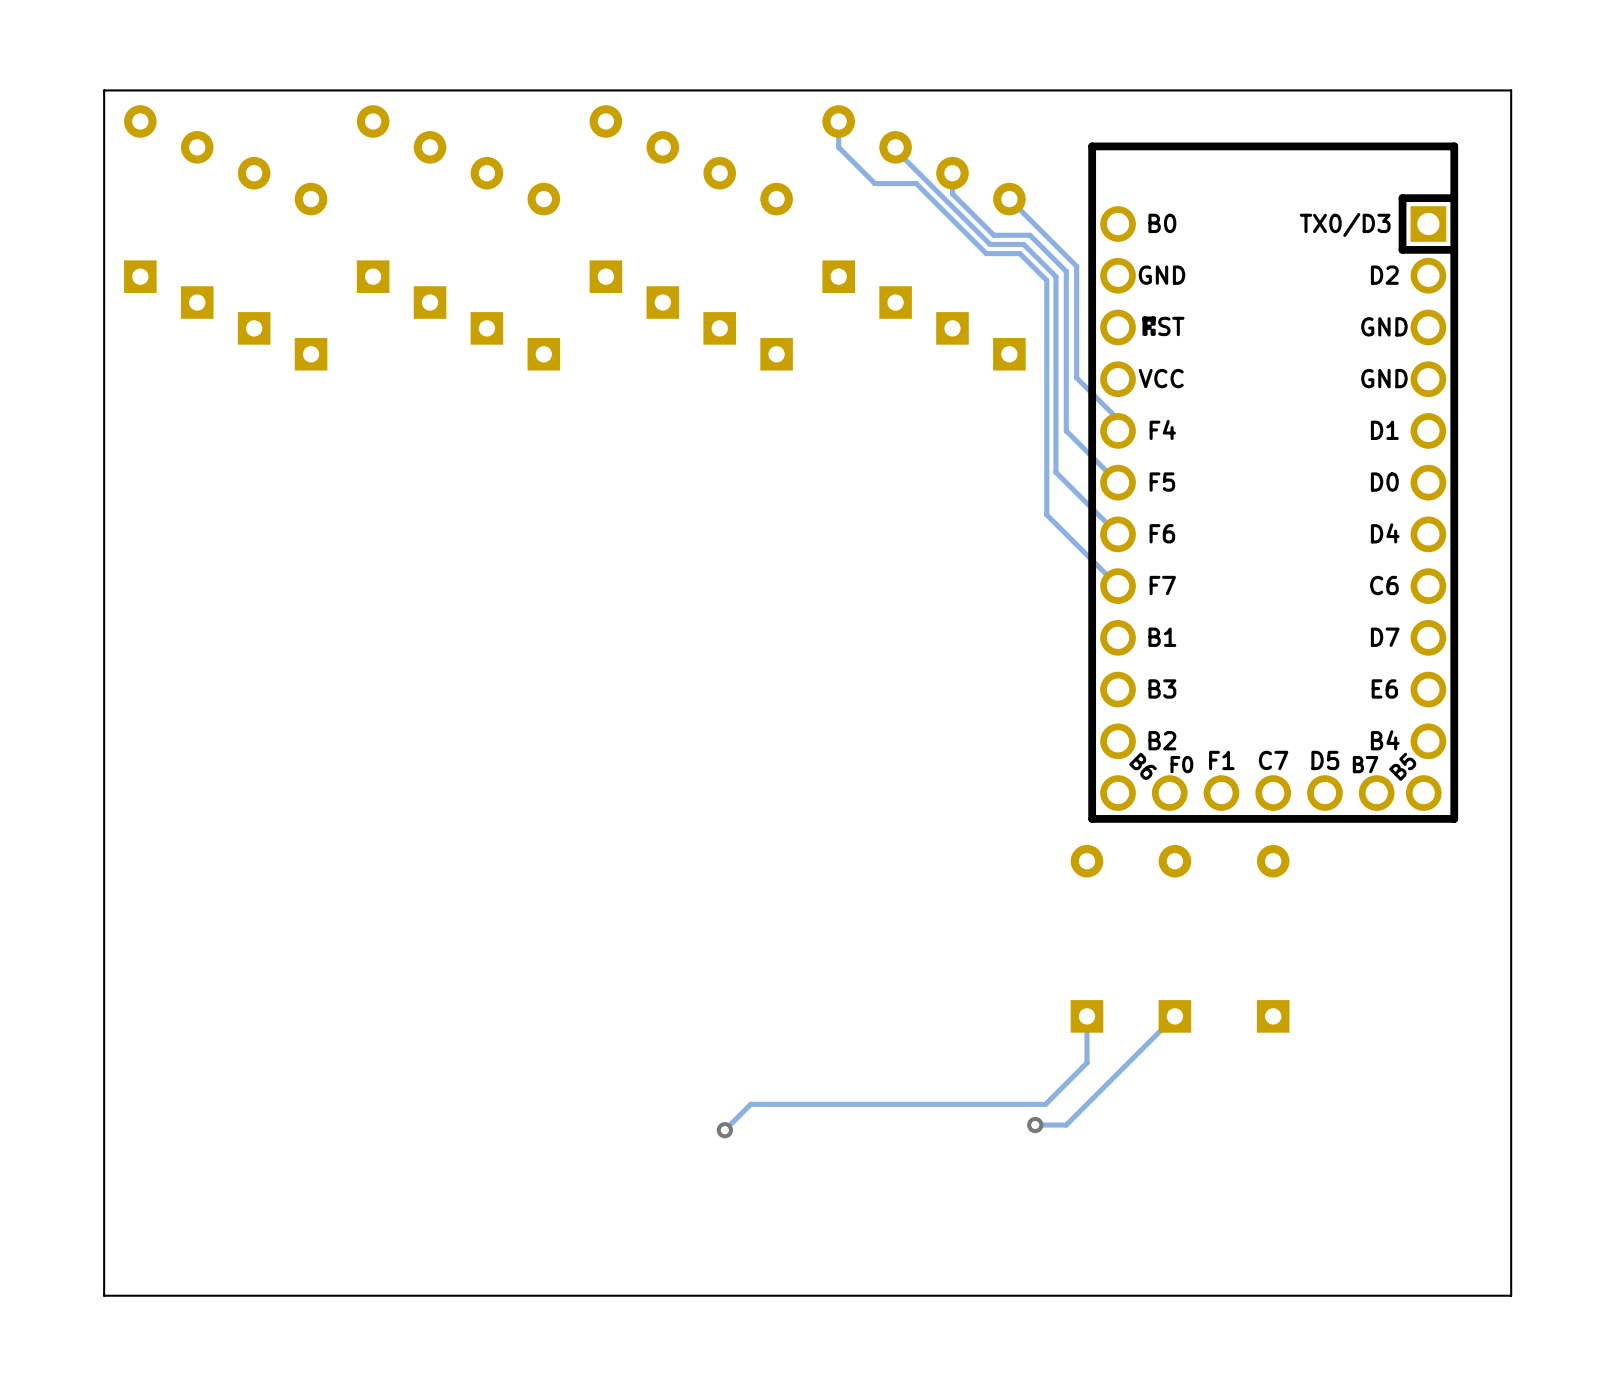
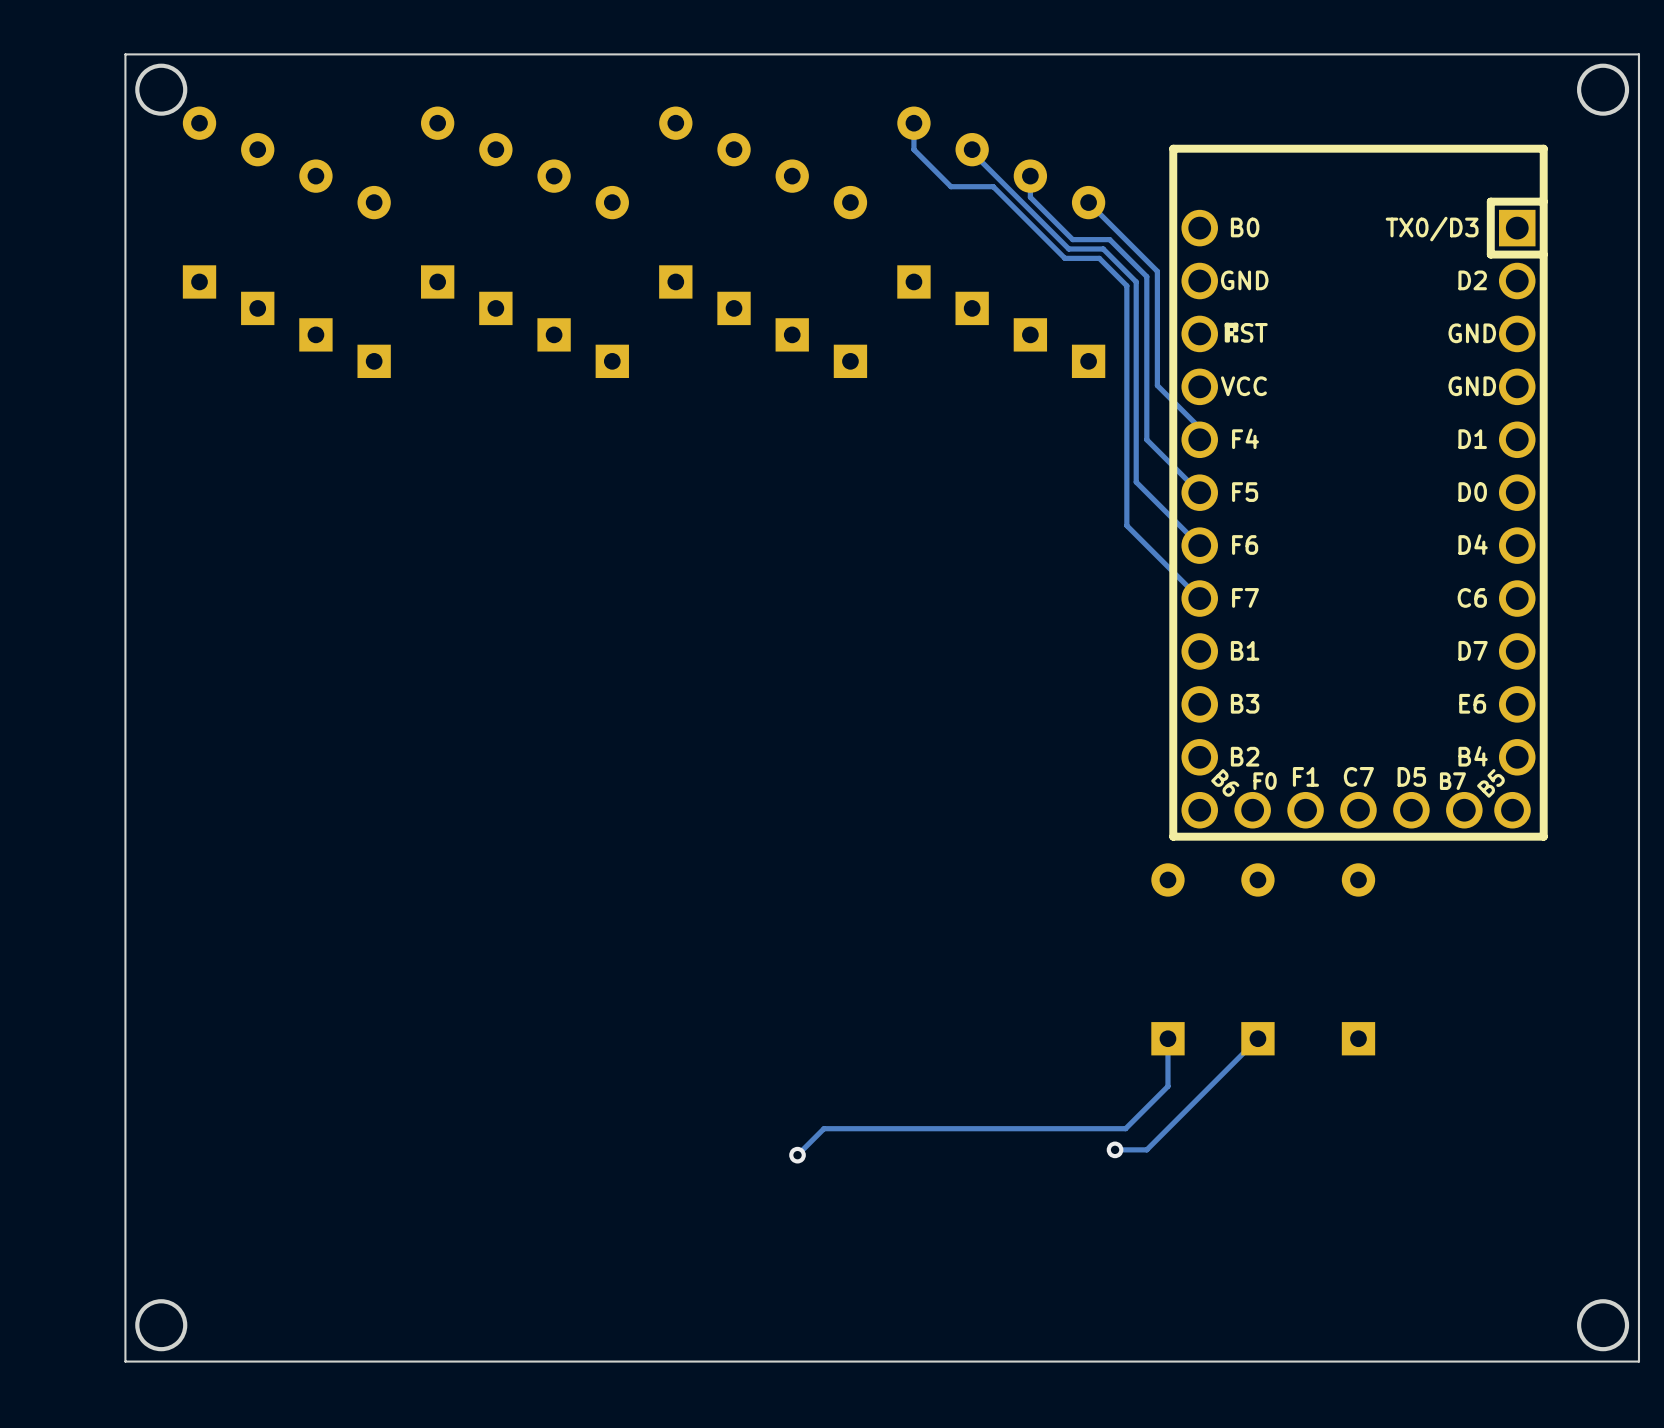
round board edge: none -> [135, 63, 188, 116]
round board edge: none -> [1577, 63, 1630, 116]
board edge: (1511, 90) (1511, 1295) (104, 1295) (104, 90) (1511, 90) -> (1638, 54) (1638, 1361) (125, 1361) (125, 54) (1638, 54)
round board edge: none -> [135, 1299, 188, 1352]
round board edge: none -> [1577, 1299, 1630, 1352]

